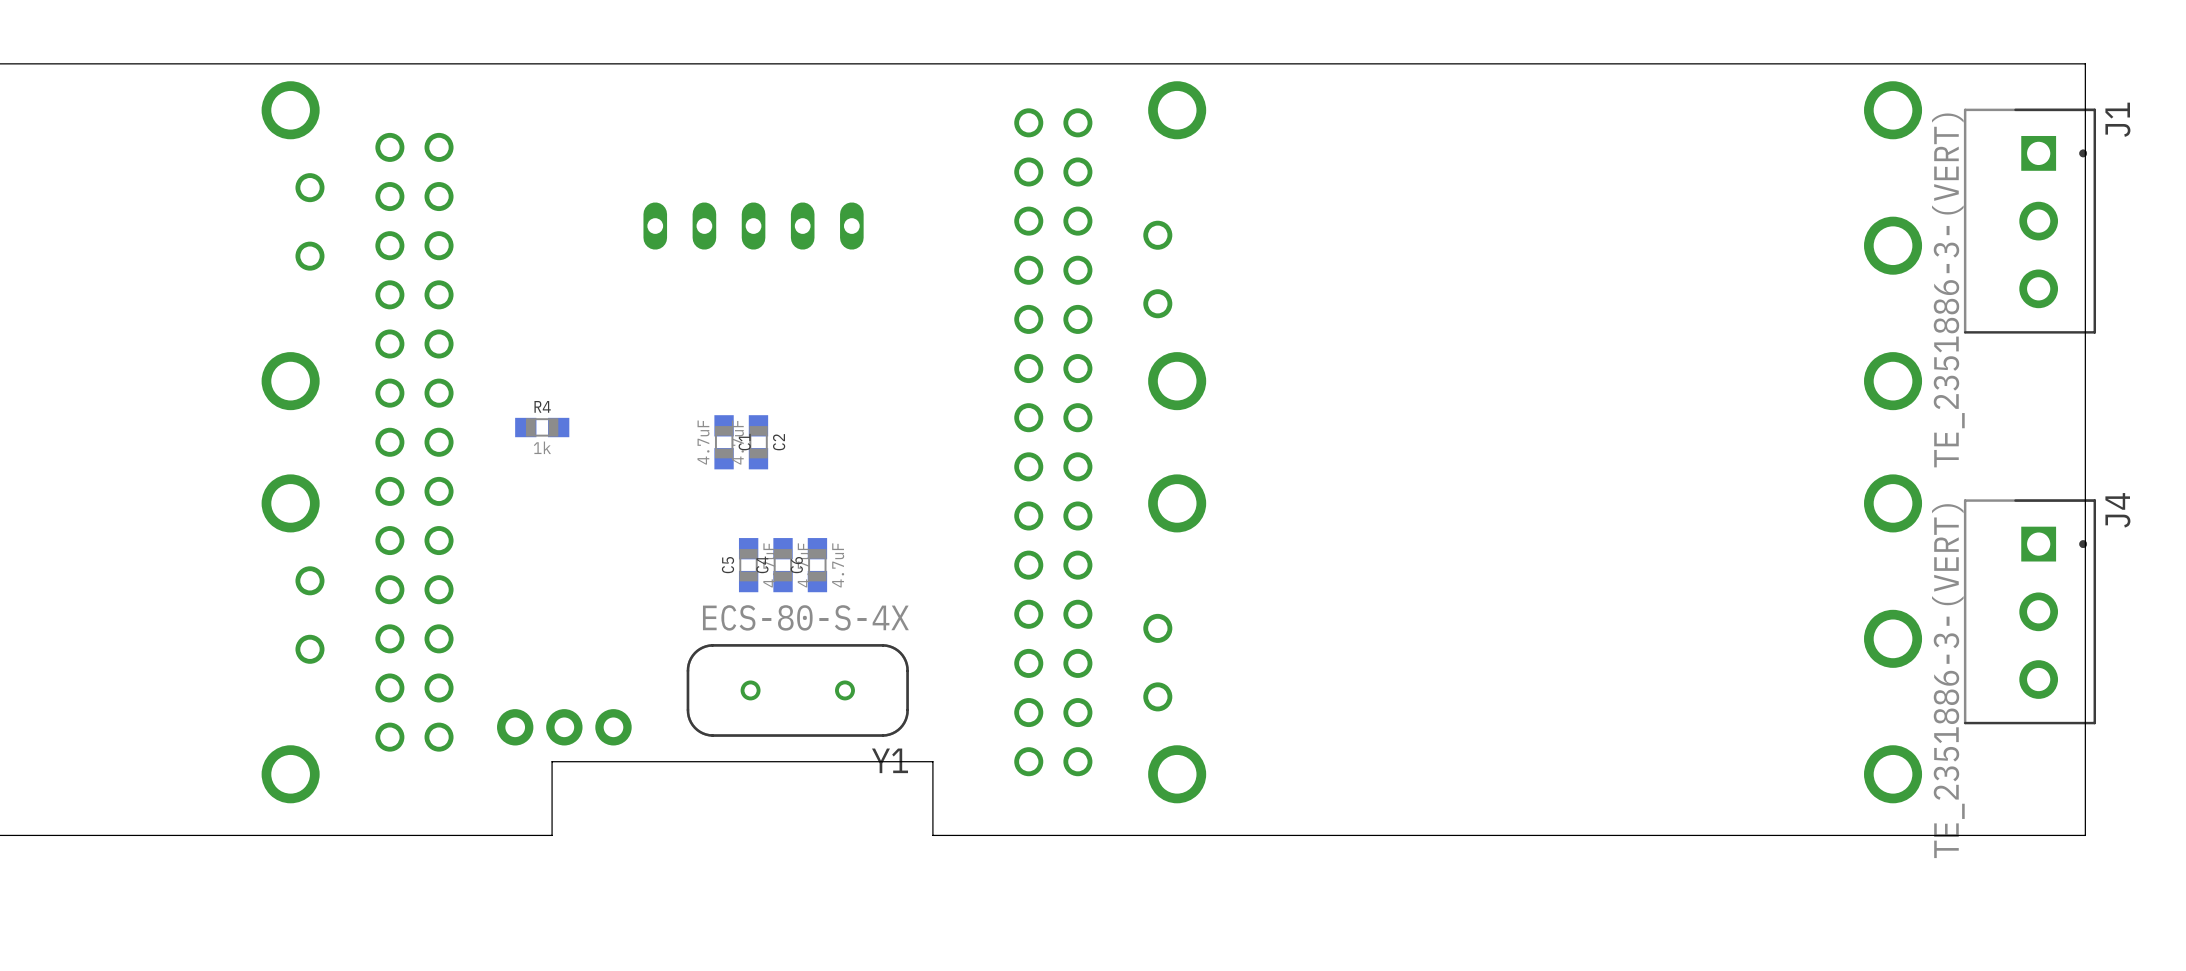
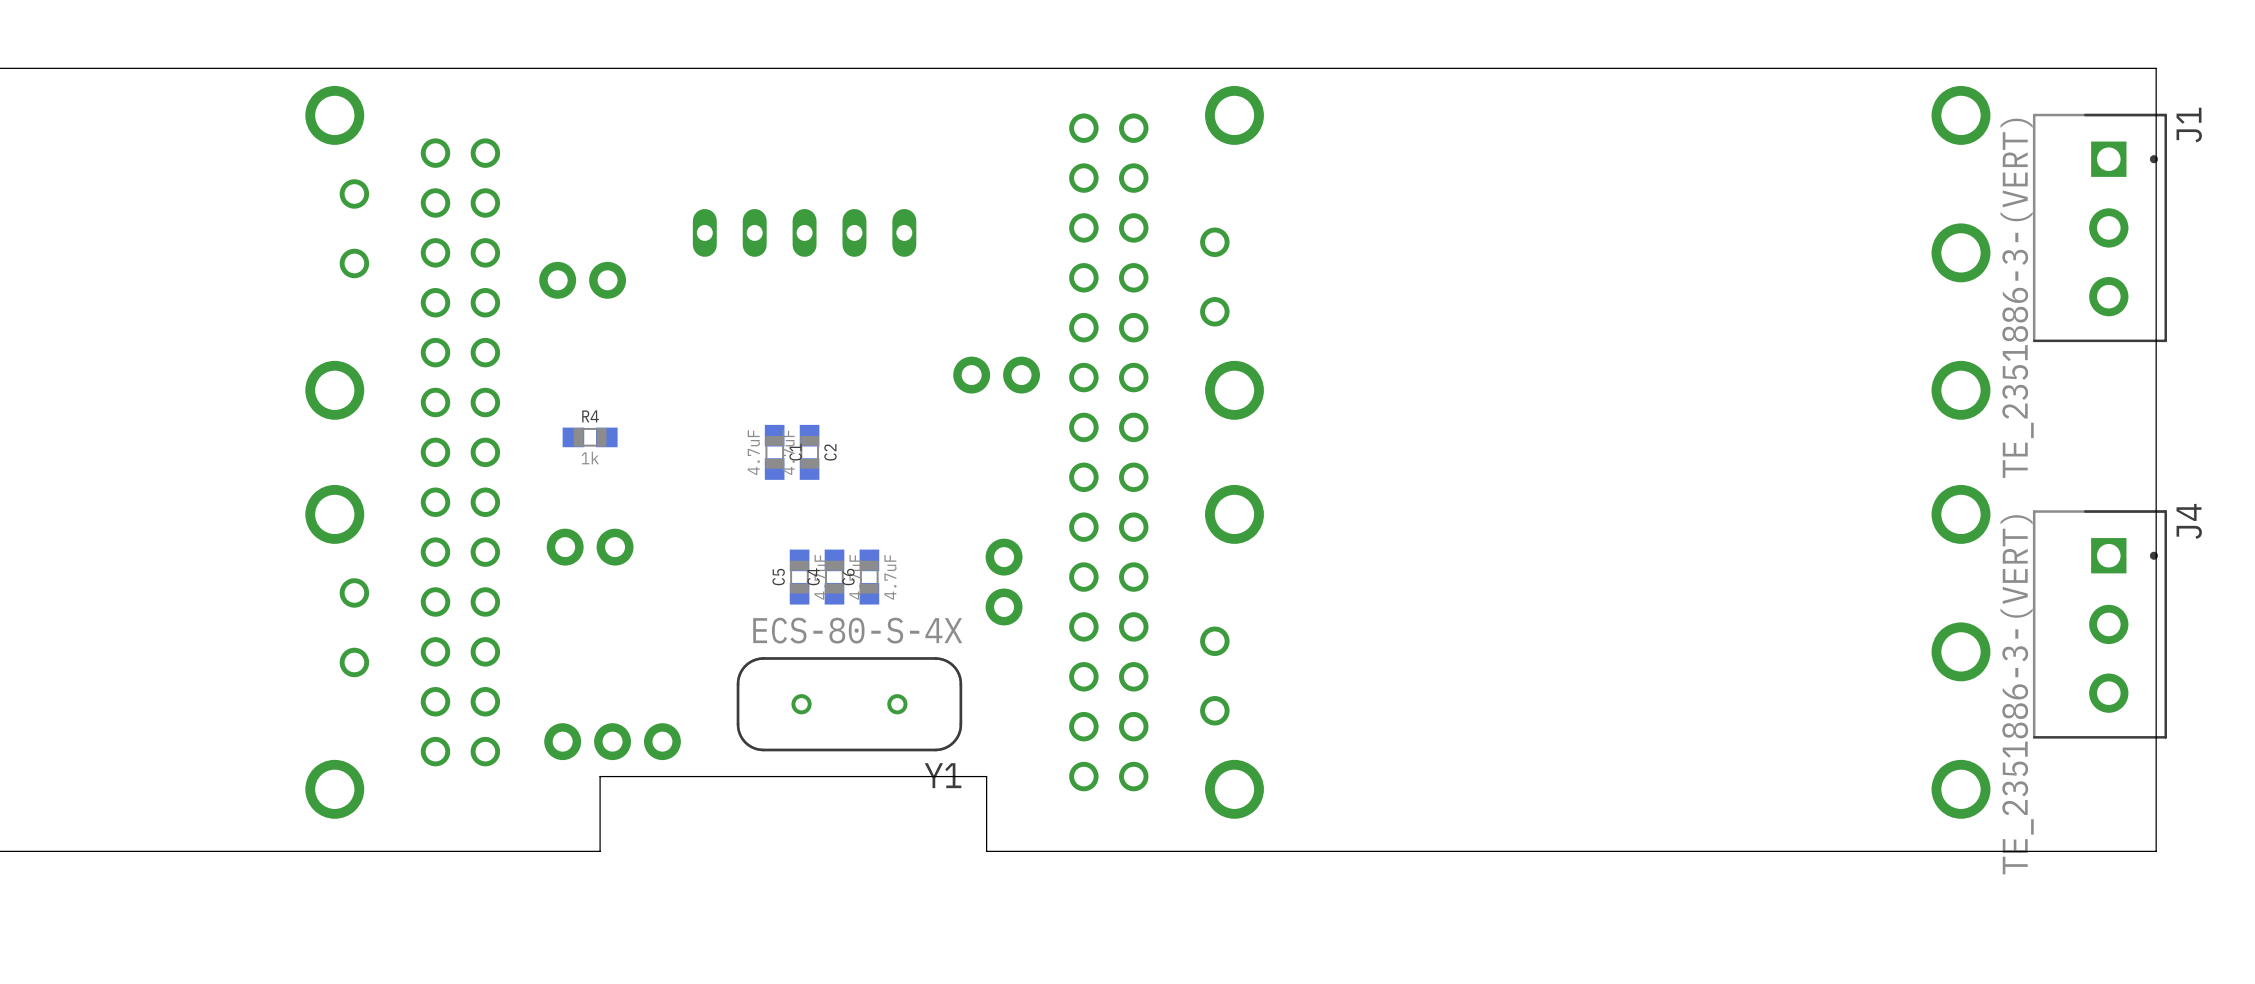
part: none -> (582, 280)
part: none -> (996, 375)
part: none -> (590, 547)
part: none -> (1004, 582)

